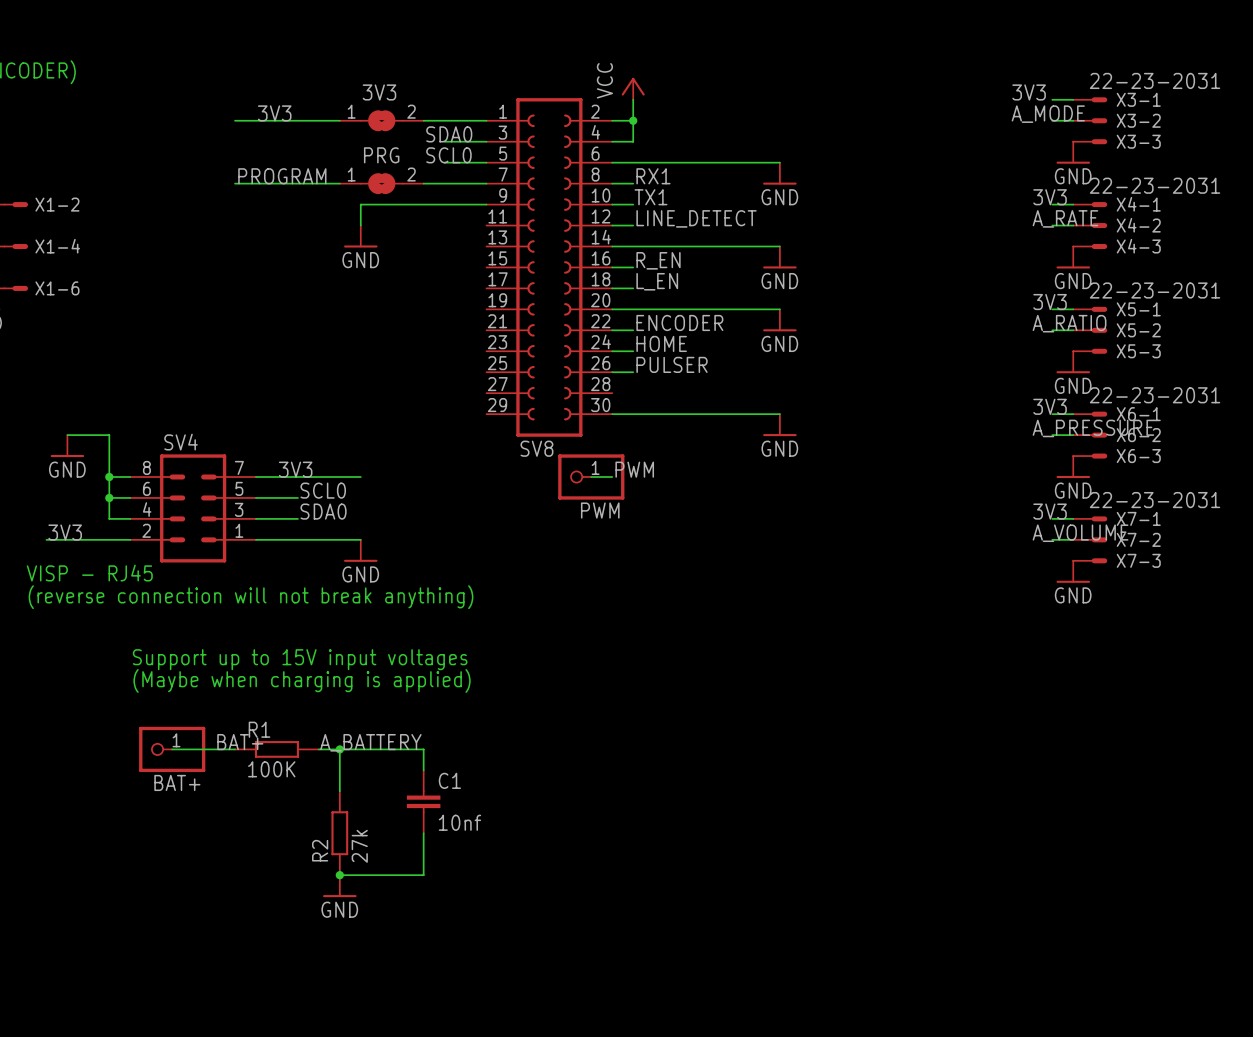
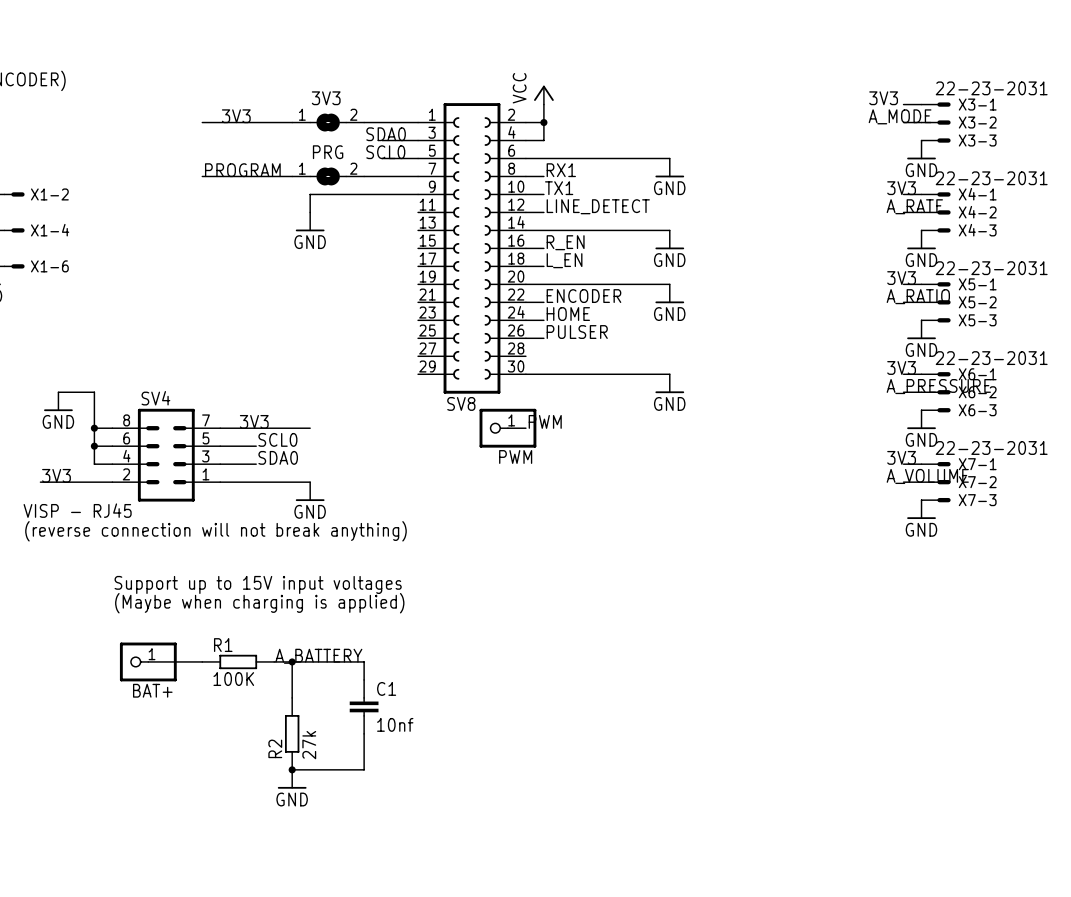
label: BAT+ (240, 742) -> none

